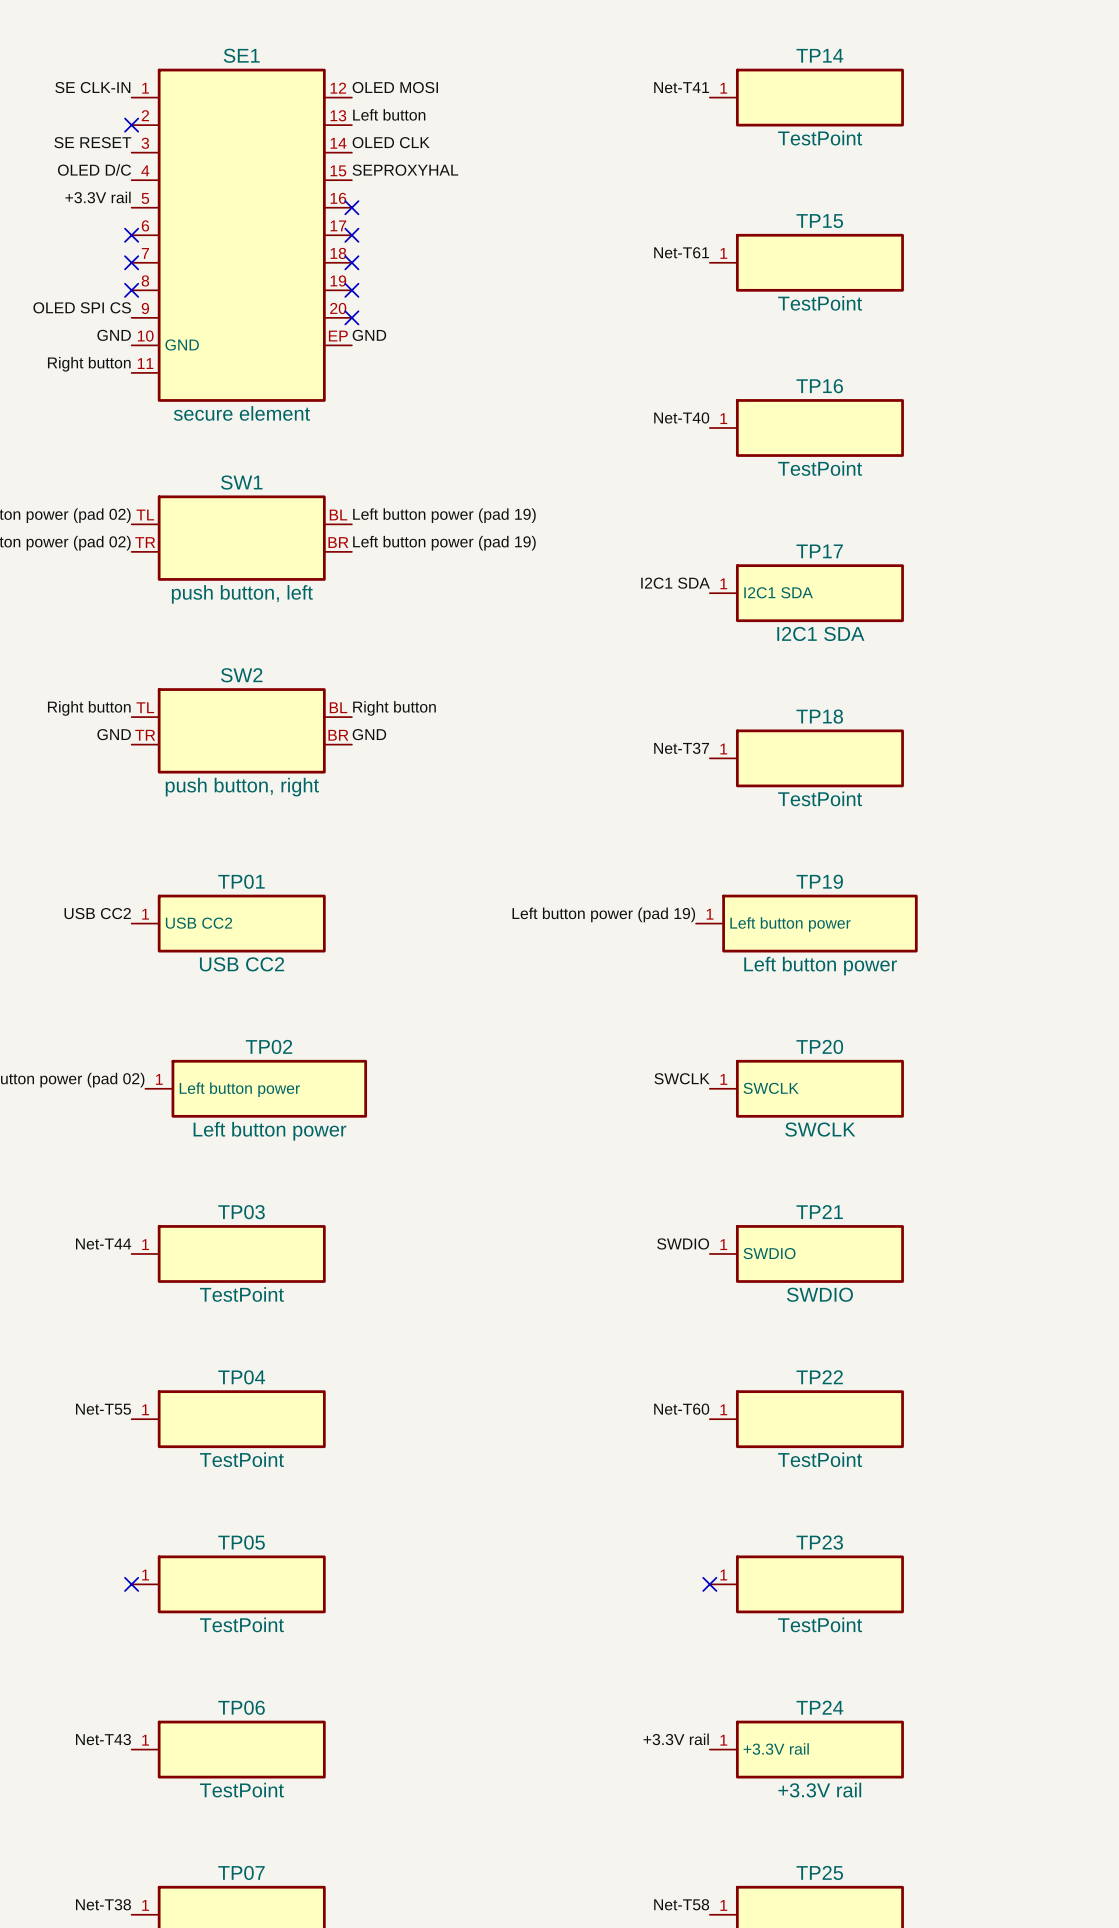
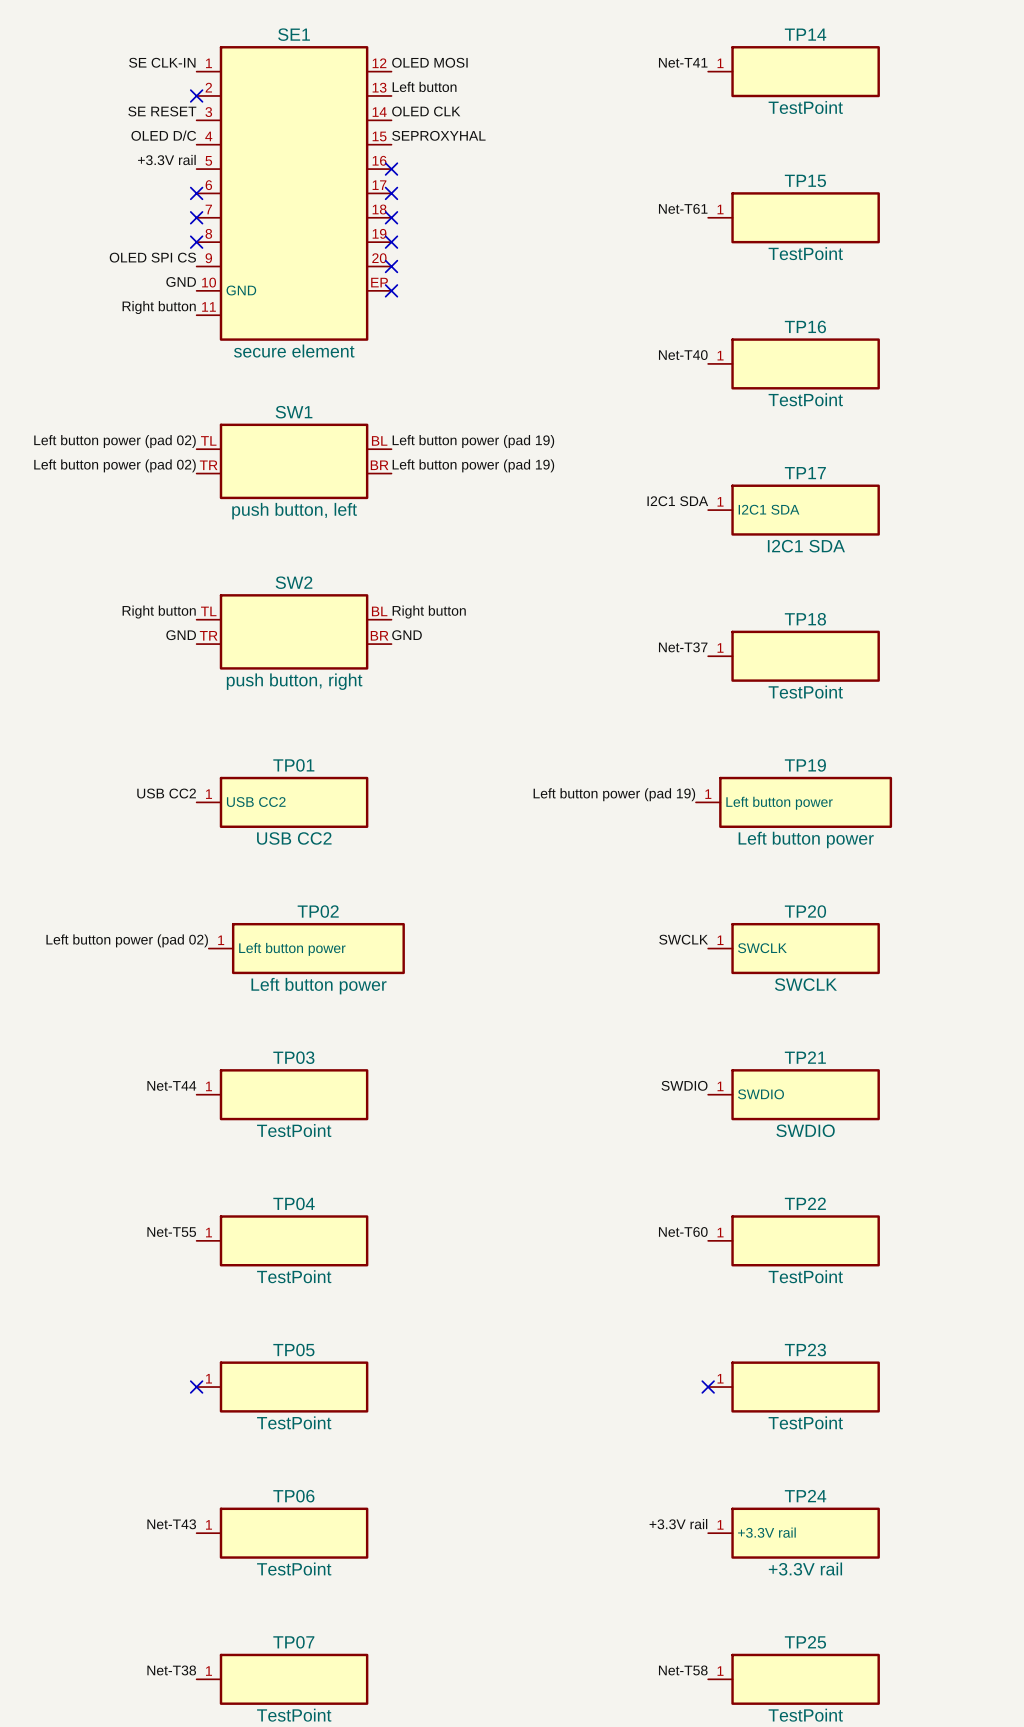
label: GND (369, 335) -> none
no-connect mark: none -> (391, 290)

